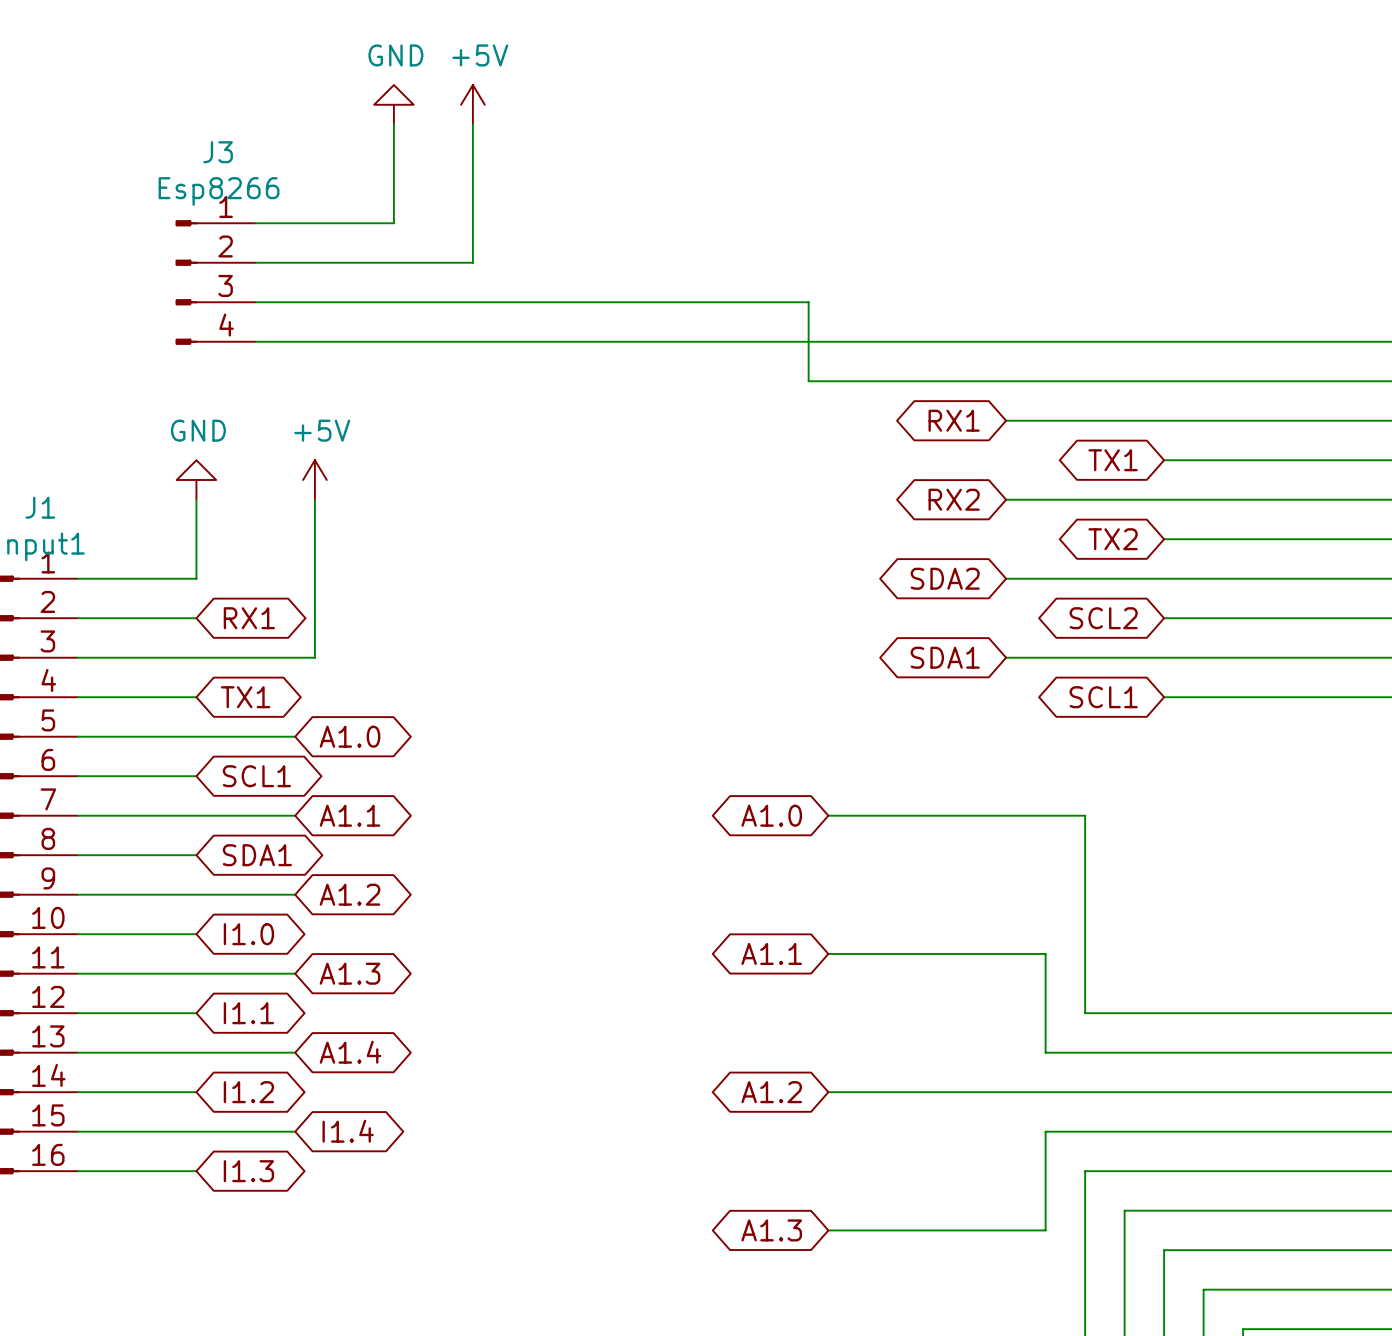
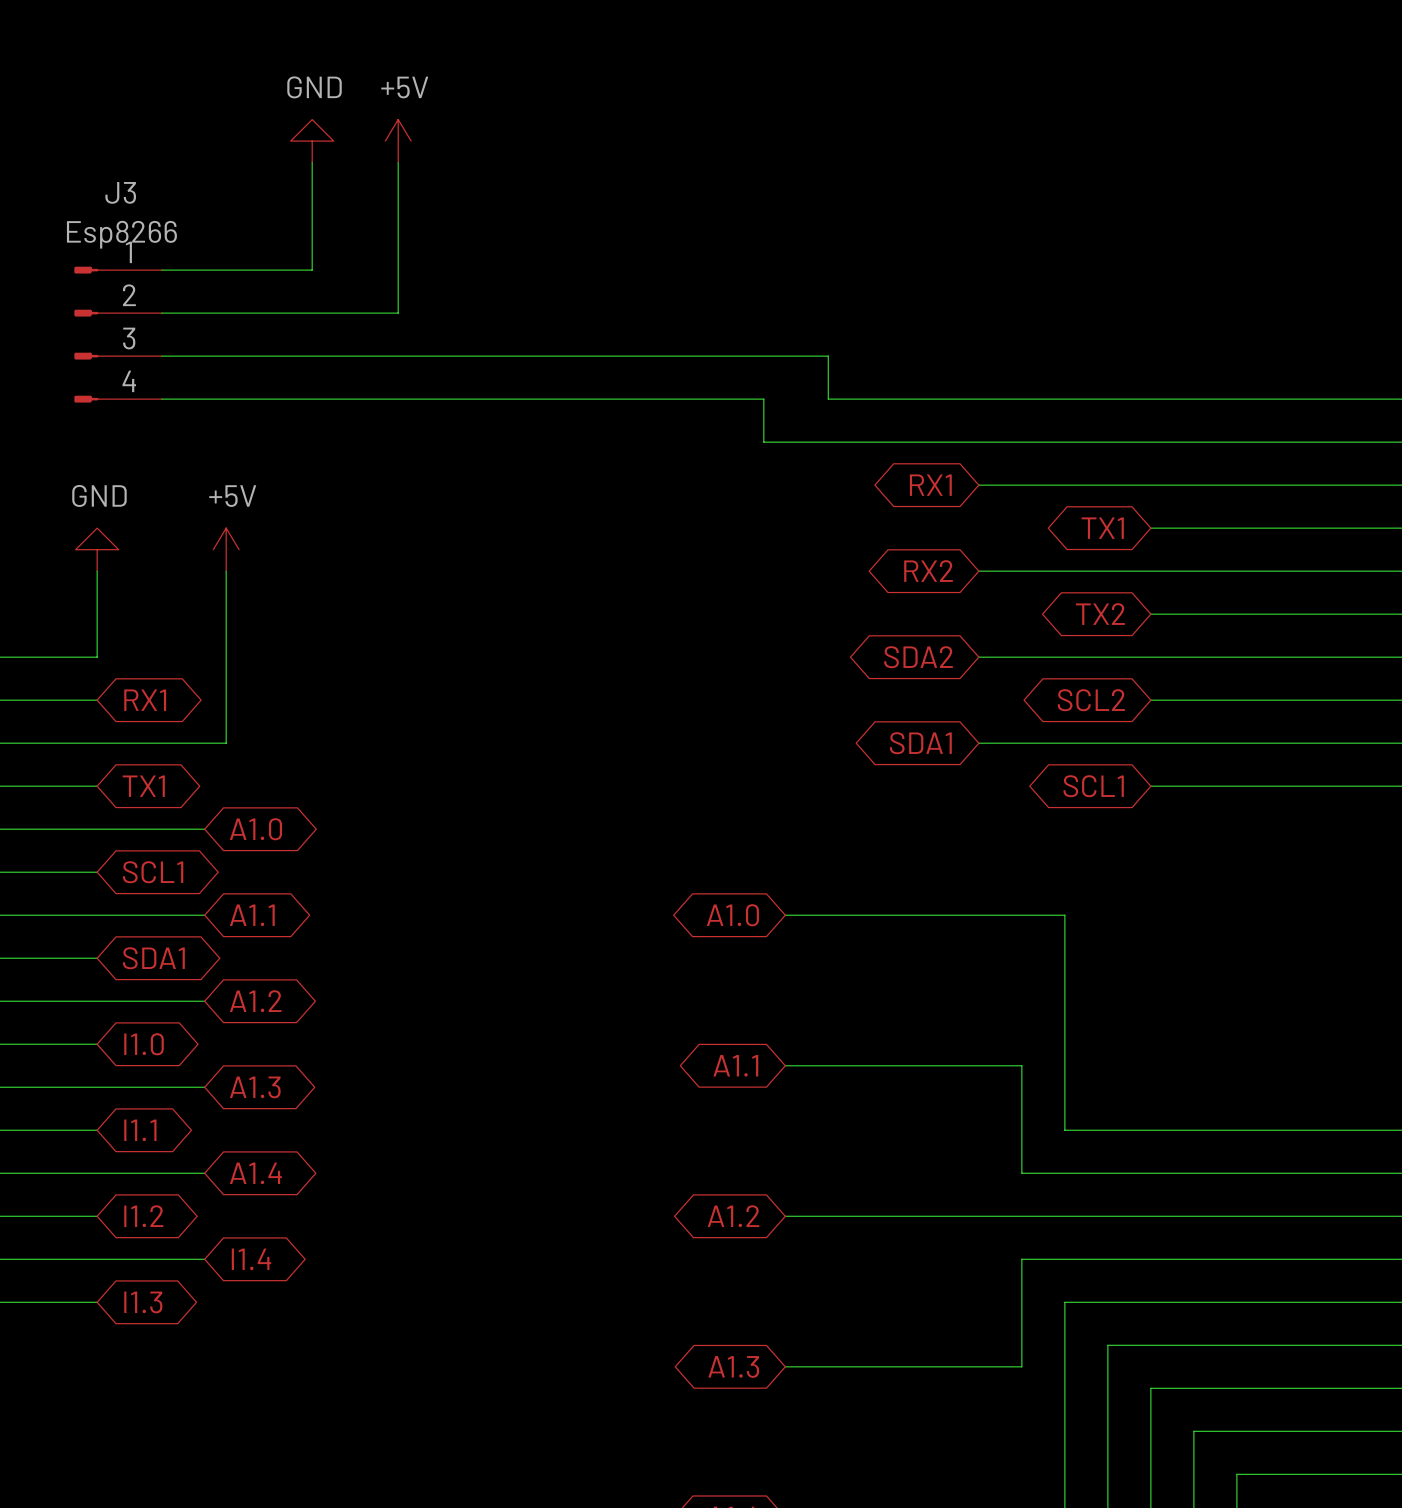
wire: (808, 302) (808, 341) (867, 341) -> (763, 356) (828, 356) (828, 399)

